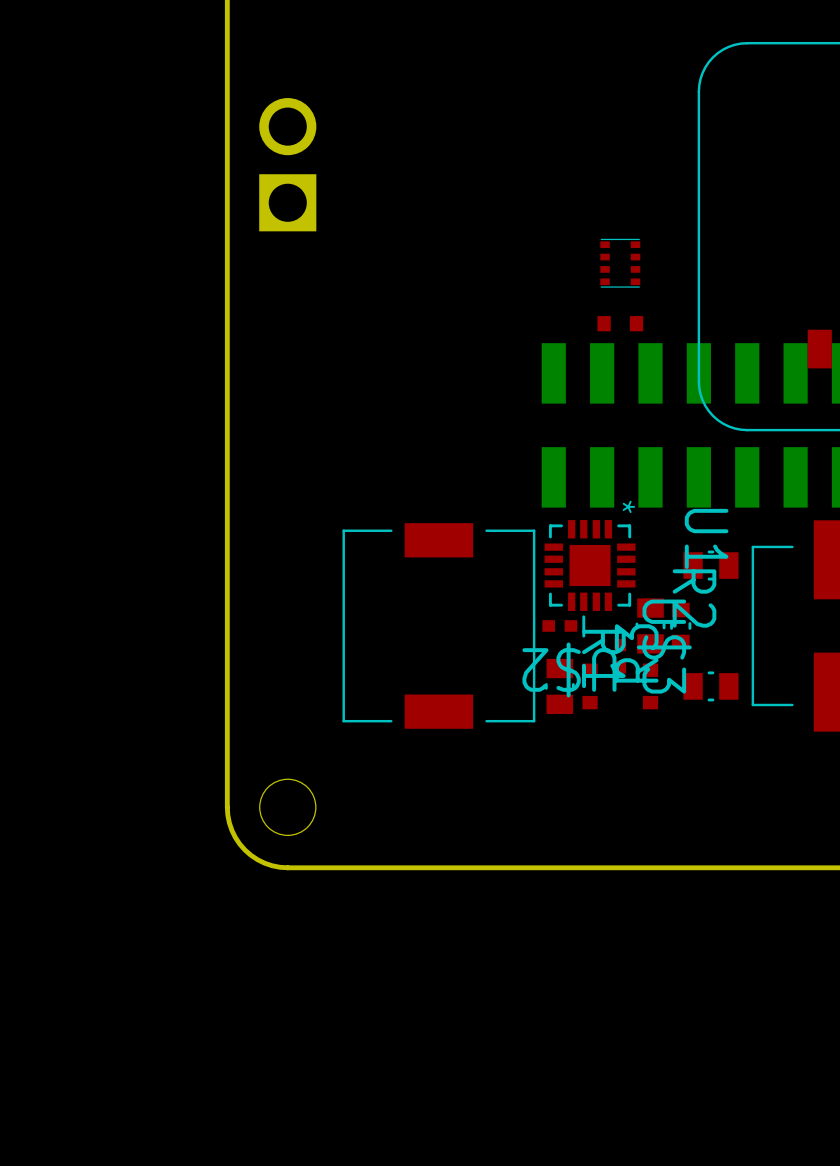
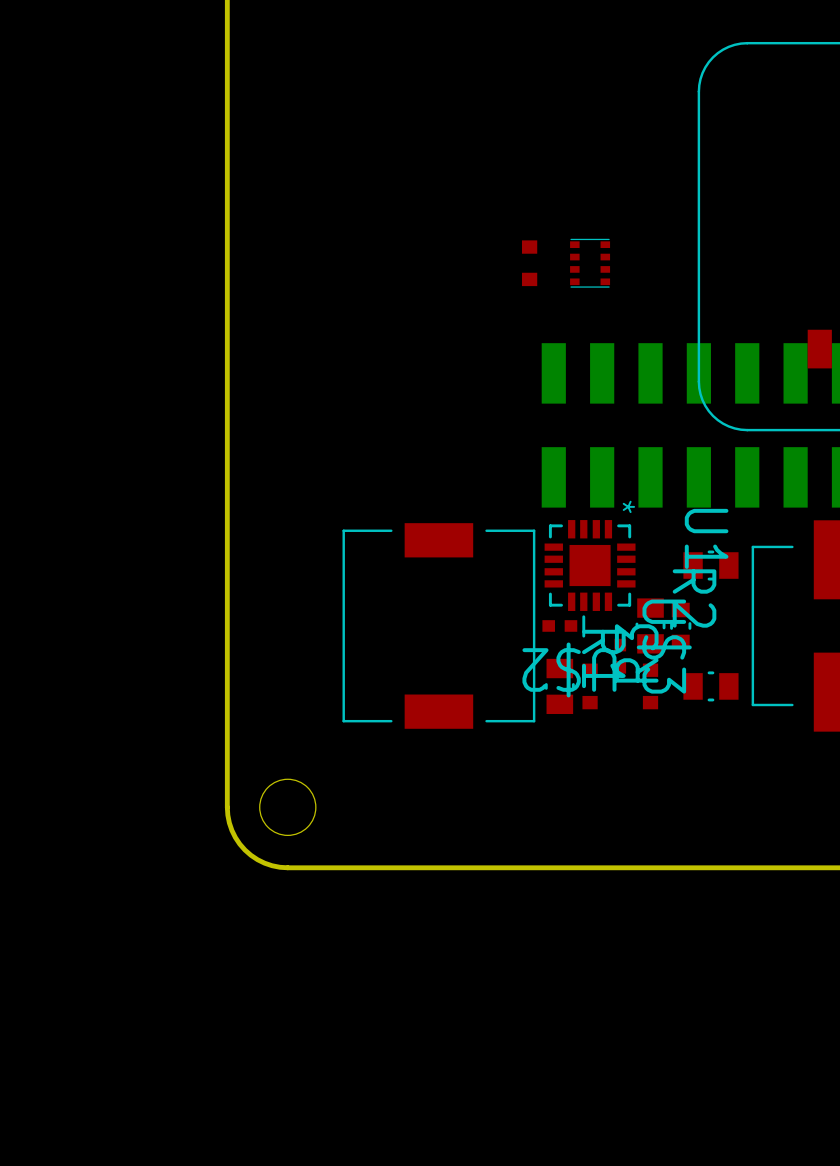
part: (287, 164) -> none
part position: (620, 263) -> (590, 263)
part rotation: 0° (620, 323) -> 90° clockwise (529, 263)
part position: (620, 323) -> (529, 263)

